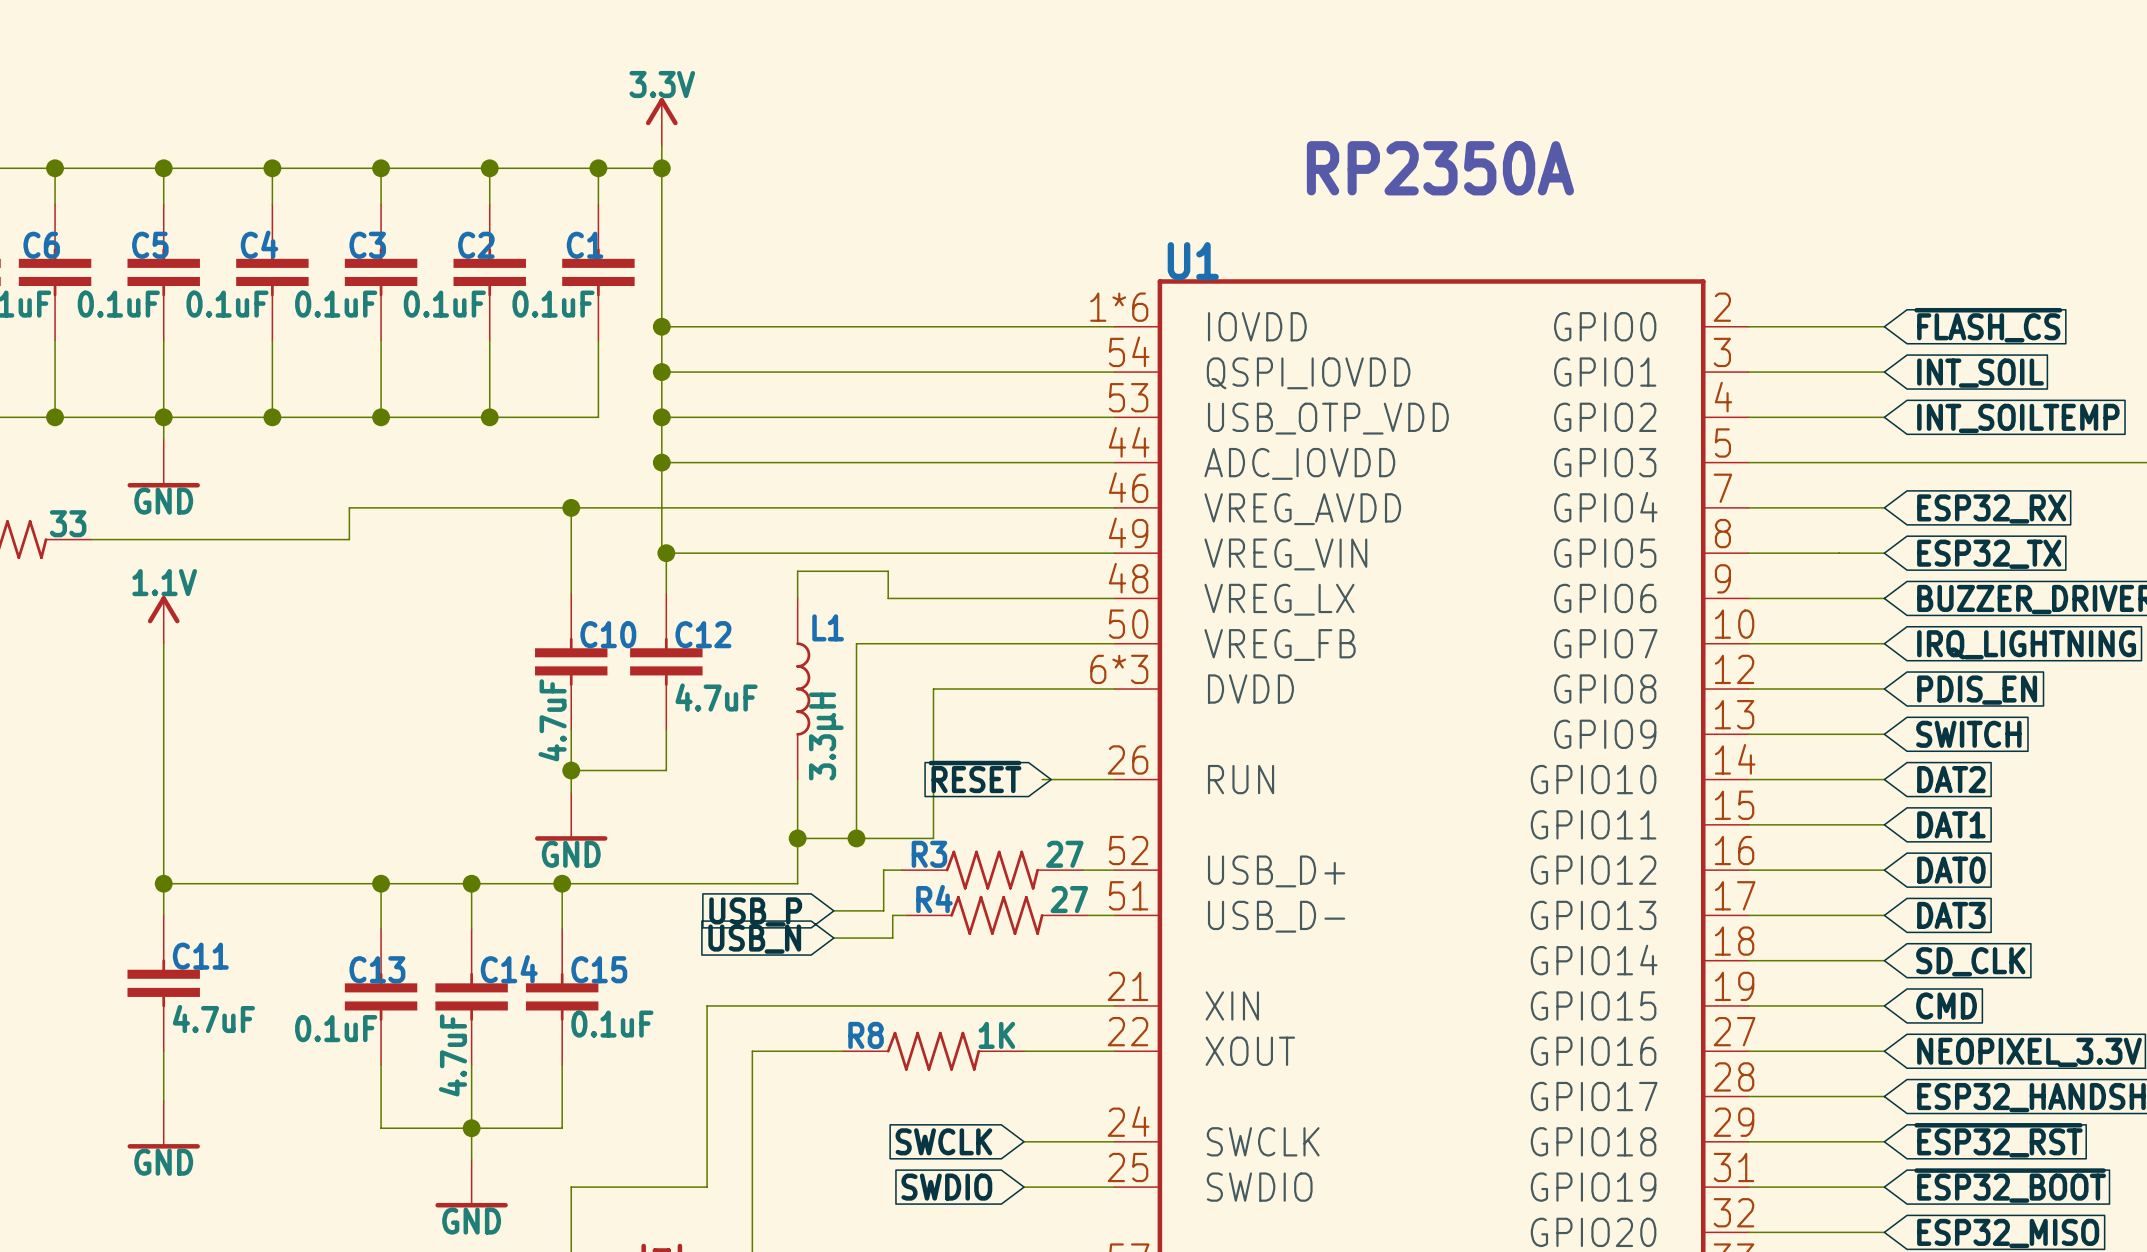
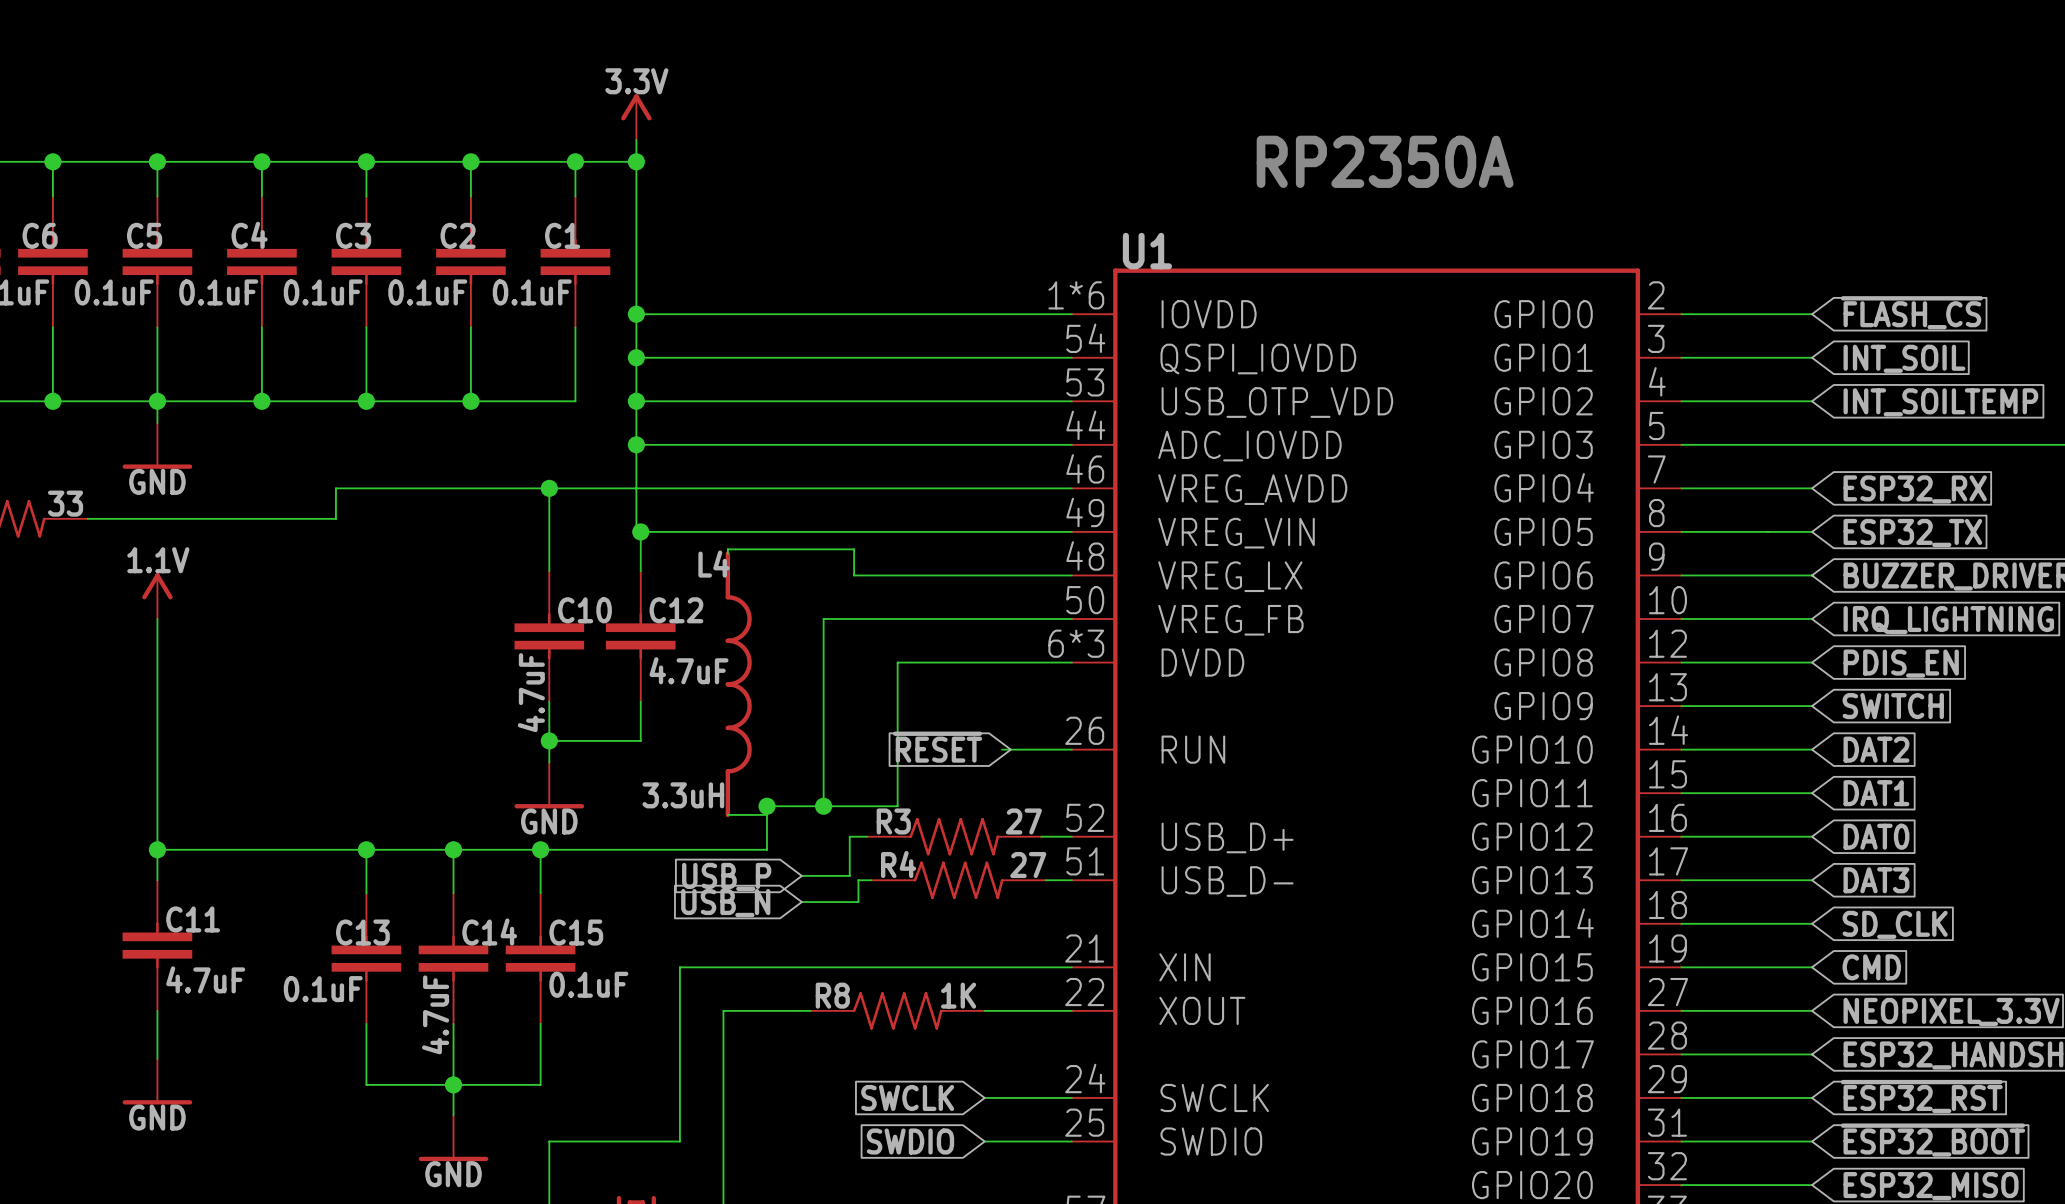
wire: (797, 571) (797, 598) -> (767, 549) (727, 549) (727, 553)
L1: 3.3µH (803, 689) -> none
L4: none -> 3.3uH (738, 684)
wire: (797, 779) (797, 838) -> none
wire: none -> (727, 814) (767, 814)

